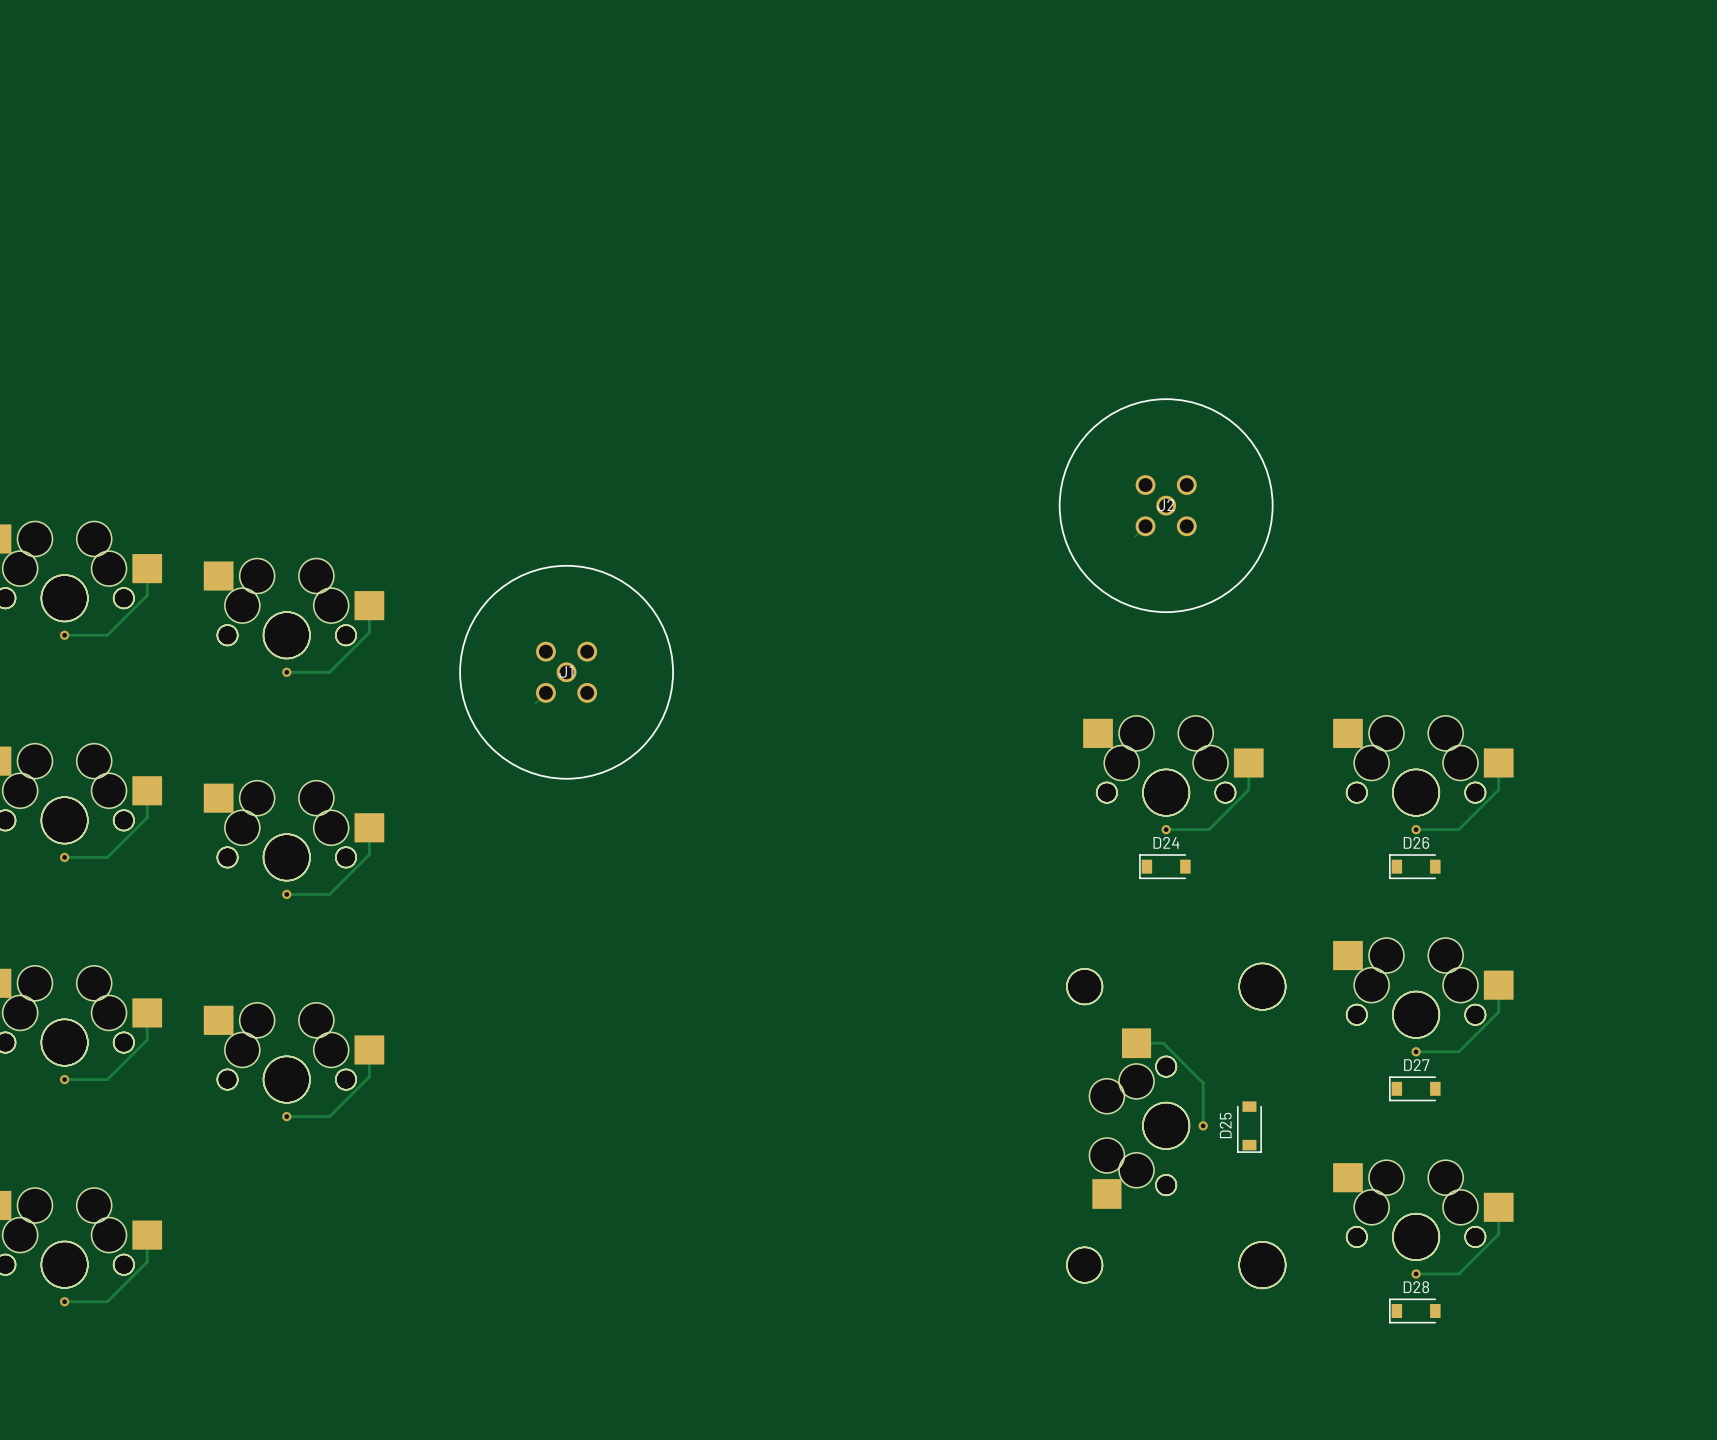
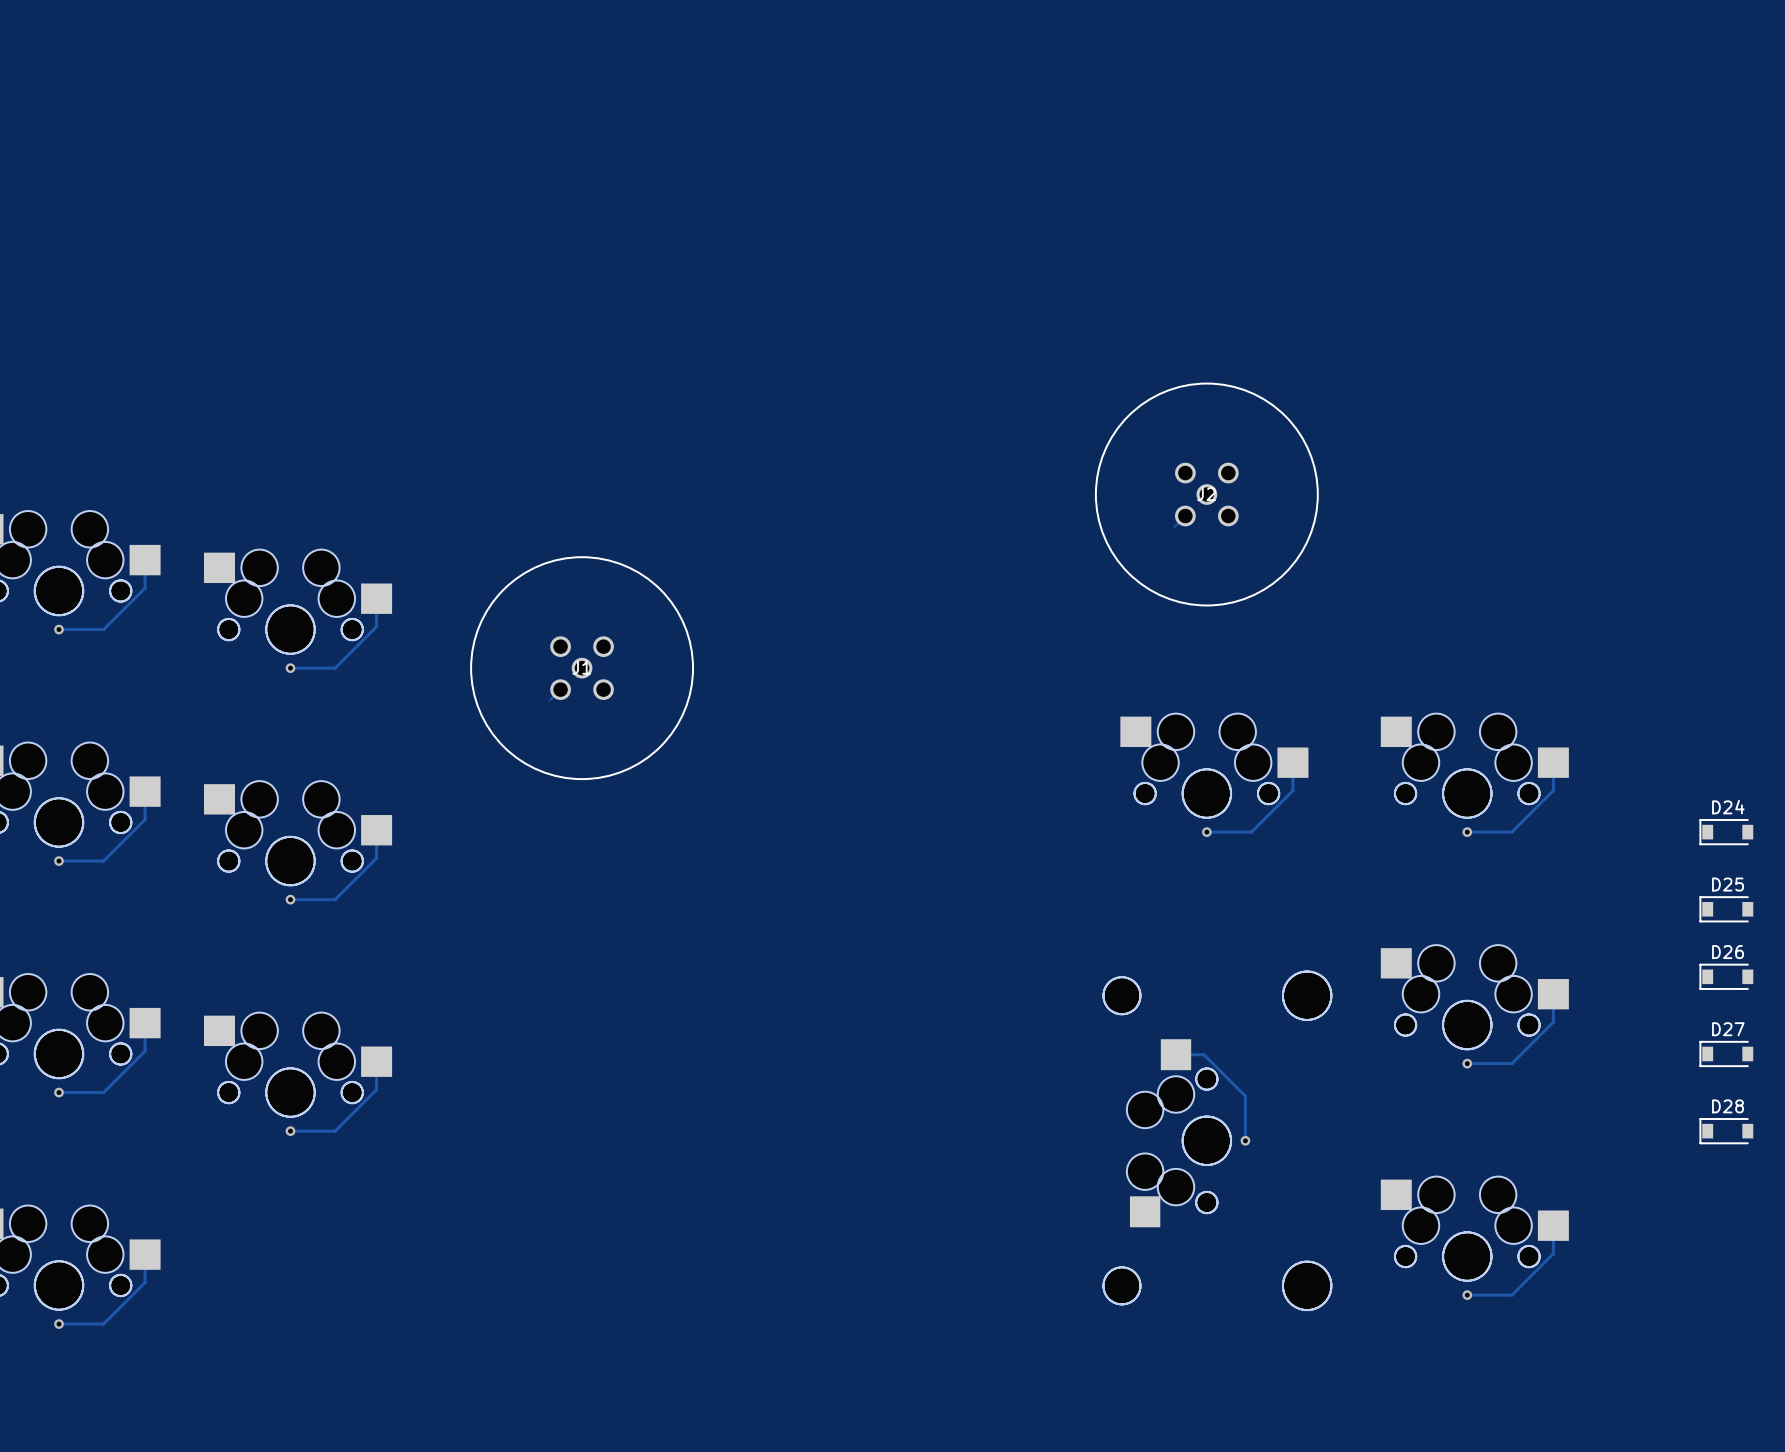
D24 position: (1164, 866) -> (1726, 832)
D26 position: (1414, 866) -> (1726, 976)
D27 position: (1414, 1088) -> (1726, 1053)
D25 rotation: 0° (1249, 1127) -> 90° clockwise (1726, 909)
D25 position: (1249, 1127) -> (1726, 909)
D28 position: (1414, 1310) -> (1726, 1131)

